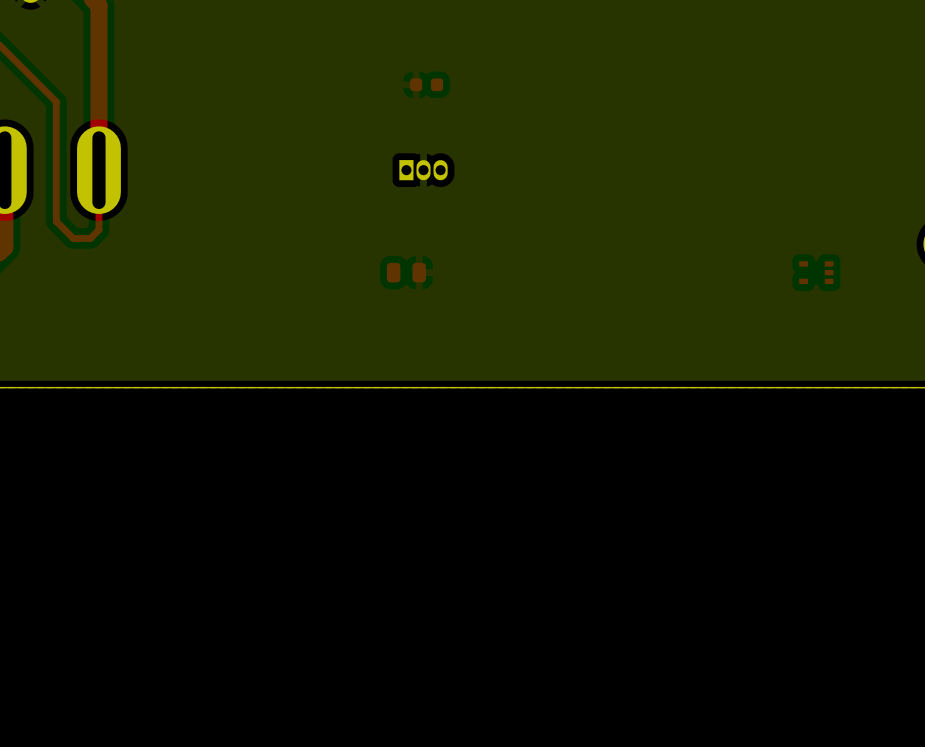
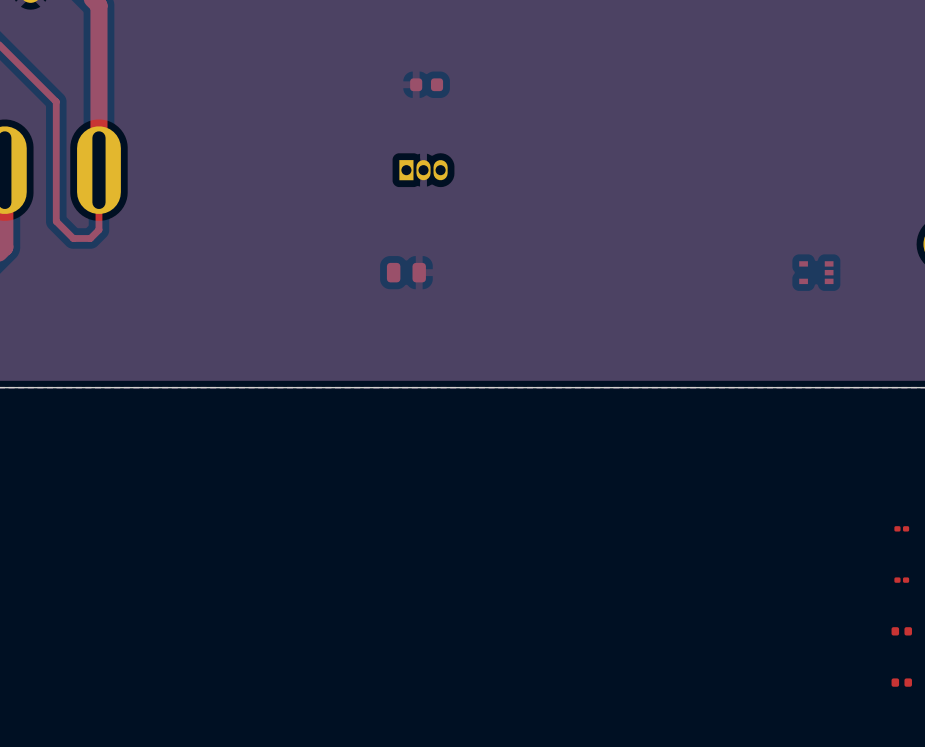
part: none -> (901, 528)
part: none -> (901, 580)
part: none -> (901, 631)
part: none -> (901, 682)

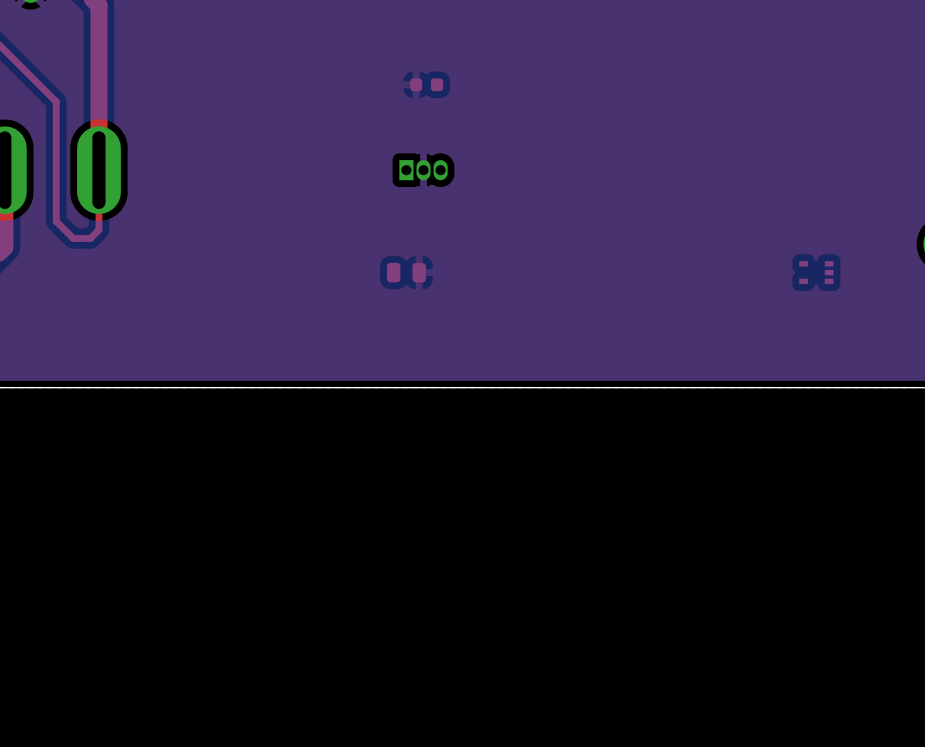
part: (901, 528) -> none
part: (901, 580) -> none
part: (901, 631) -> none
part: (901, 682) -> none

